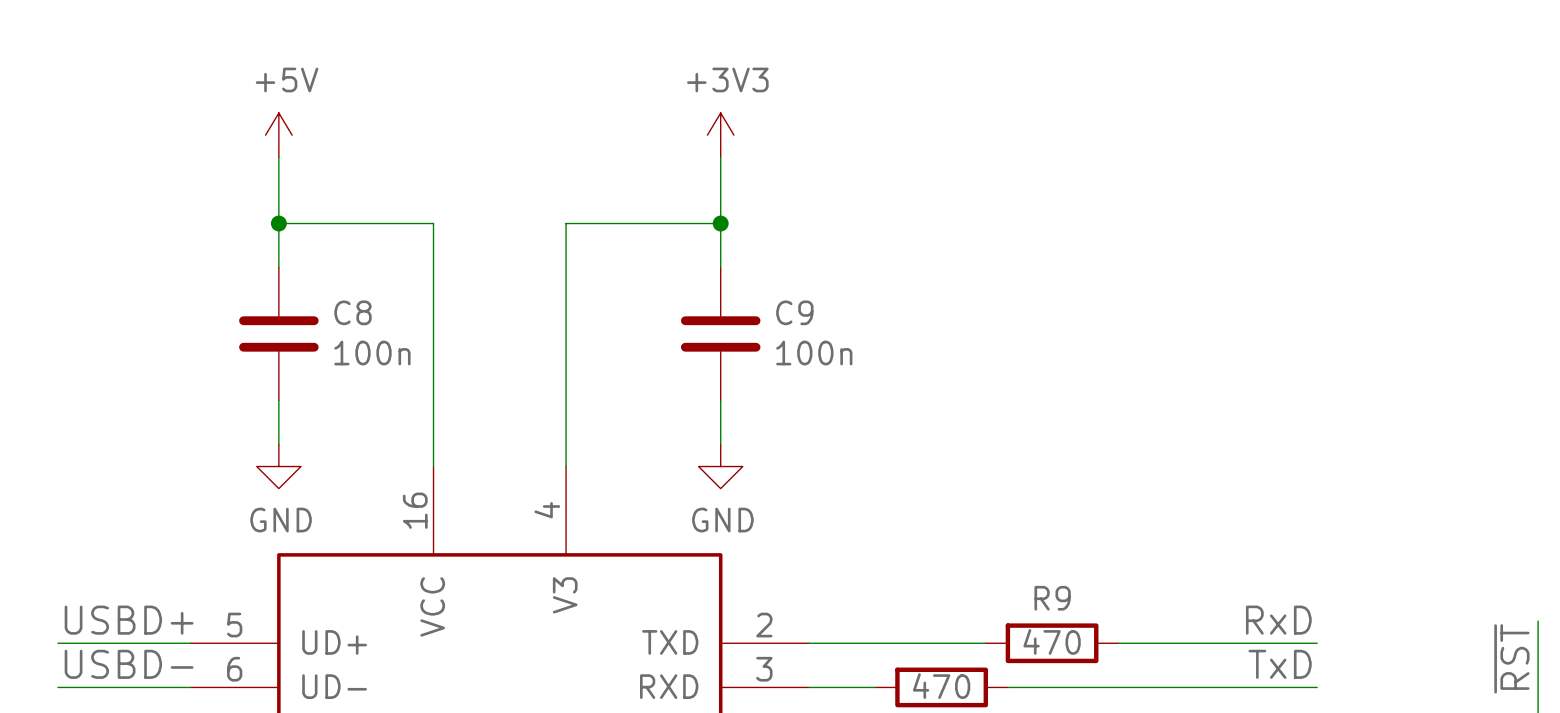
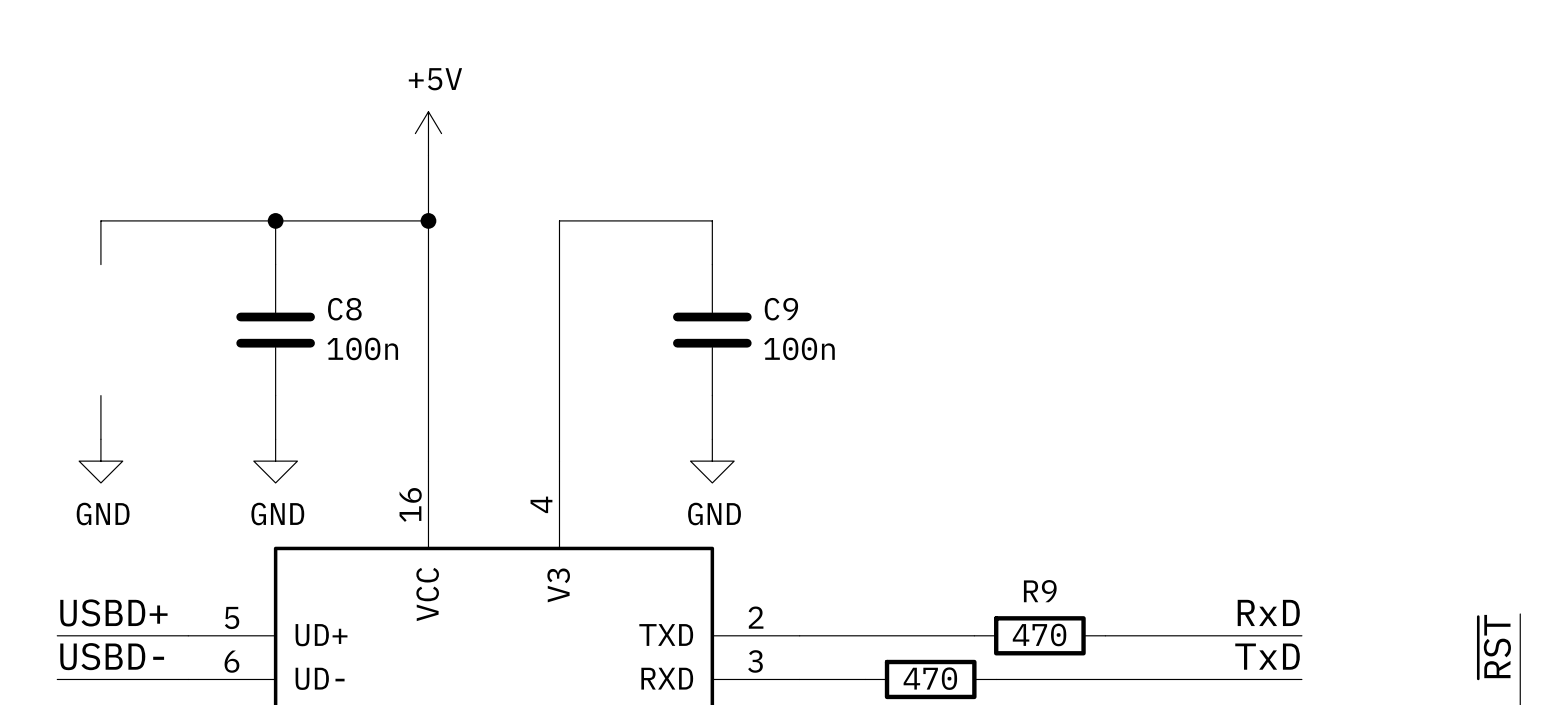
power symbol position: +5V (278, 135) -> +5V (428, 133)
power symbol: +3V3 (720, 135) -> none
wire: (278, 157) (278, 223) -> (100, 264) (100, 220) (275, 220)
wire: (720, 157) (720, 223) -> (428, 155) (428, 220)
junction: none -> (428, 220)
junction: (720, 223) -> none
wire: none -> (100, 395) (100, 439)
power symbol: none -> GND (100, 461)

